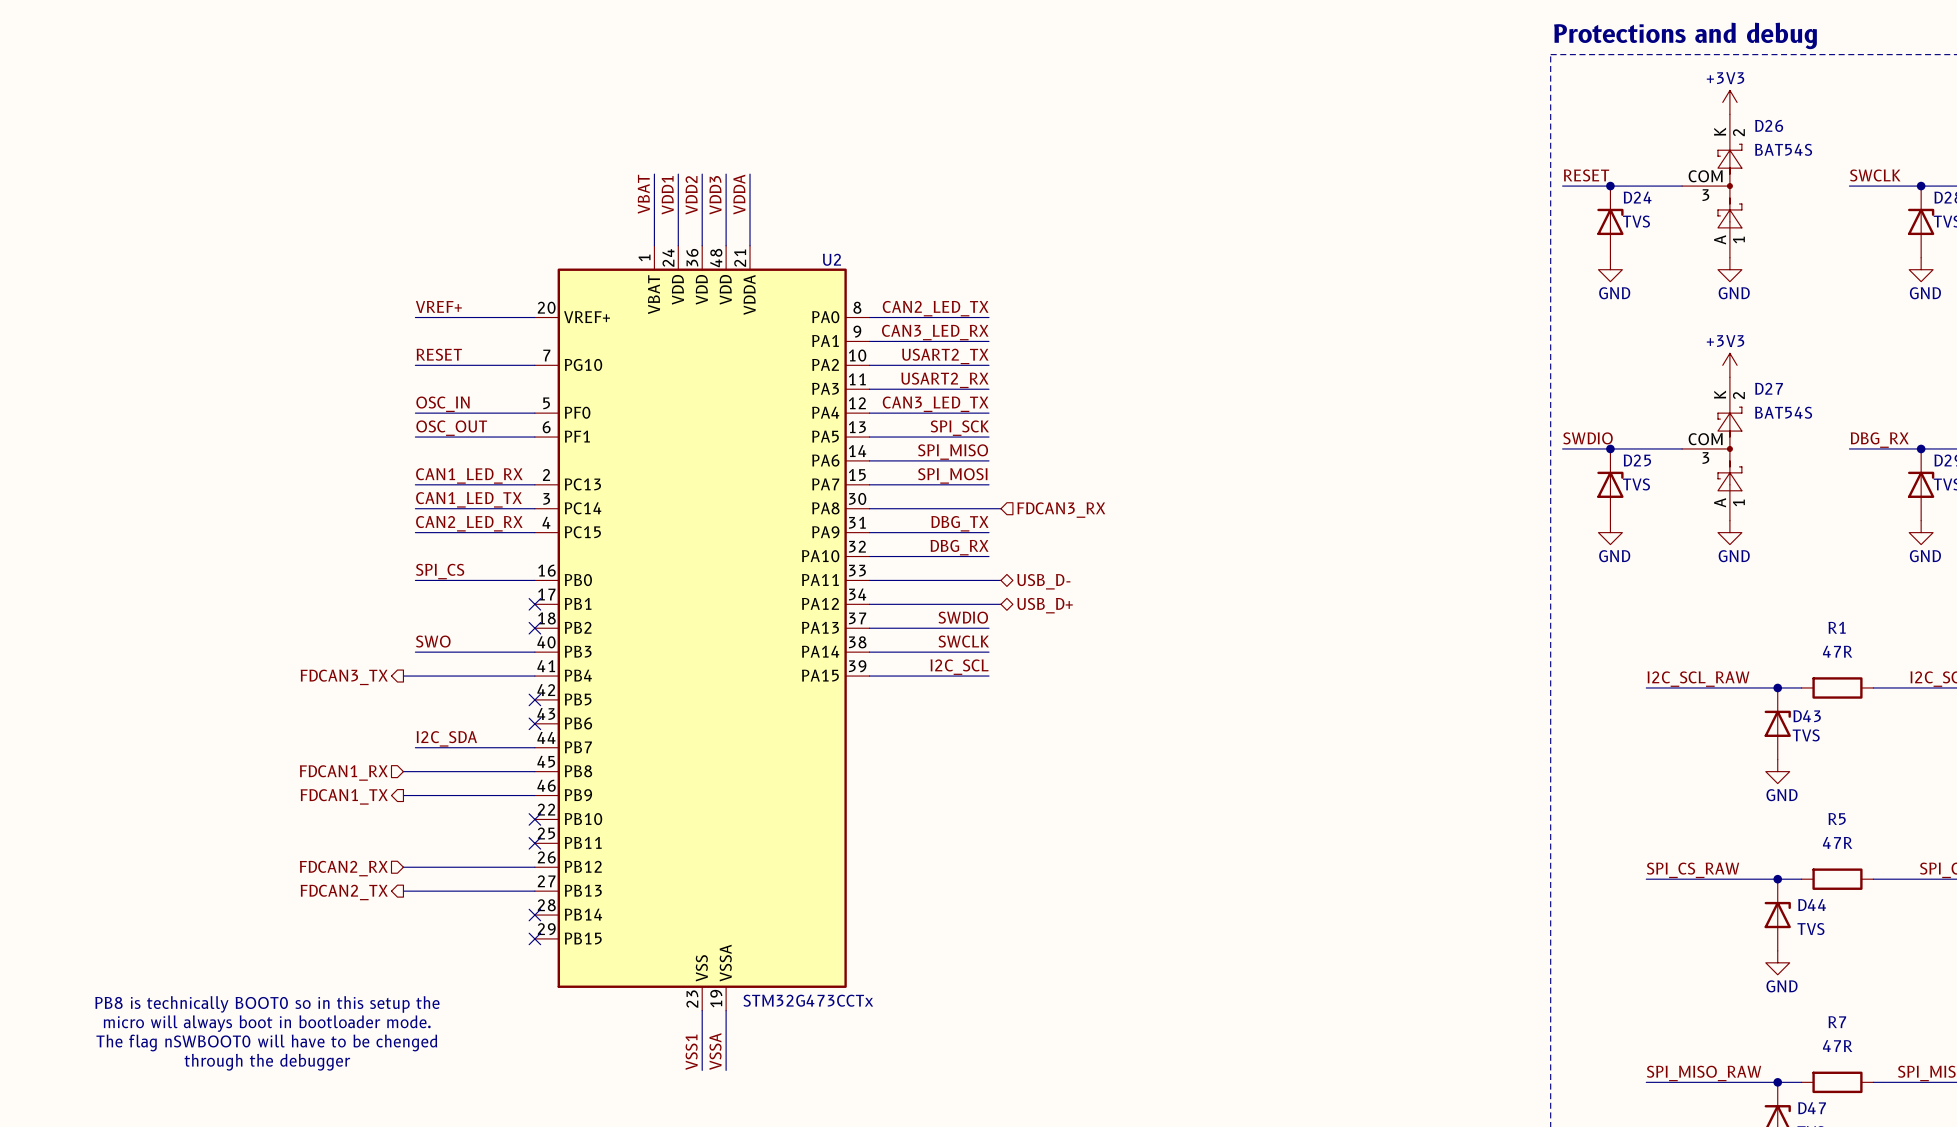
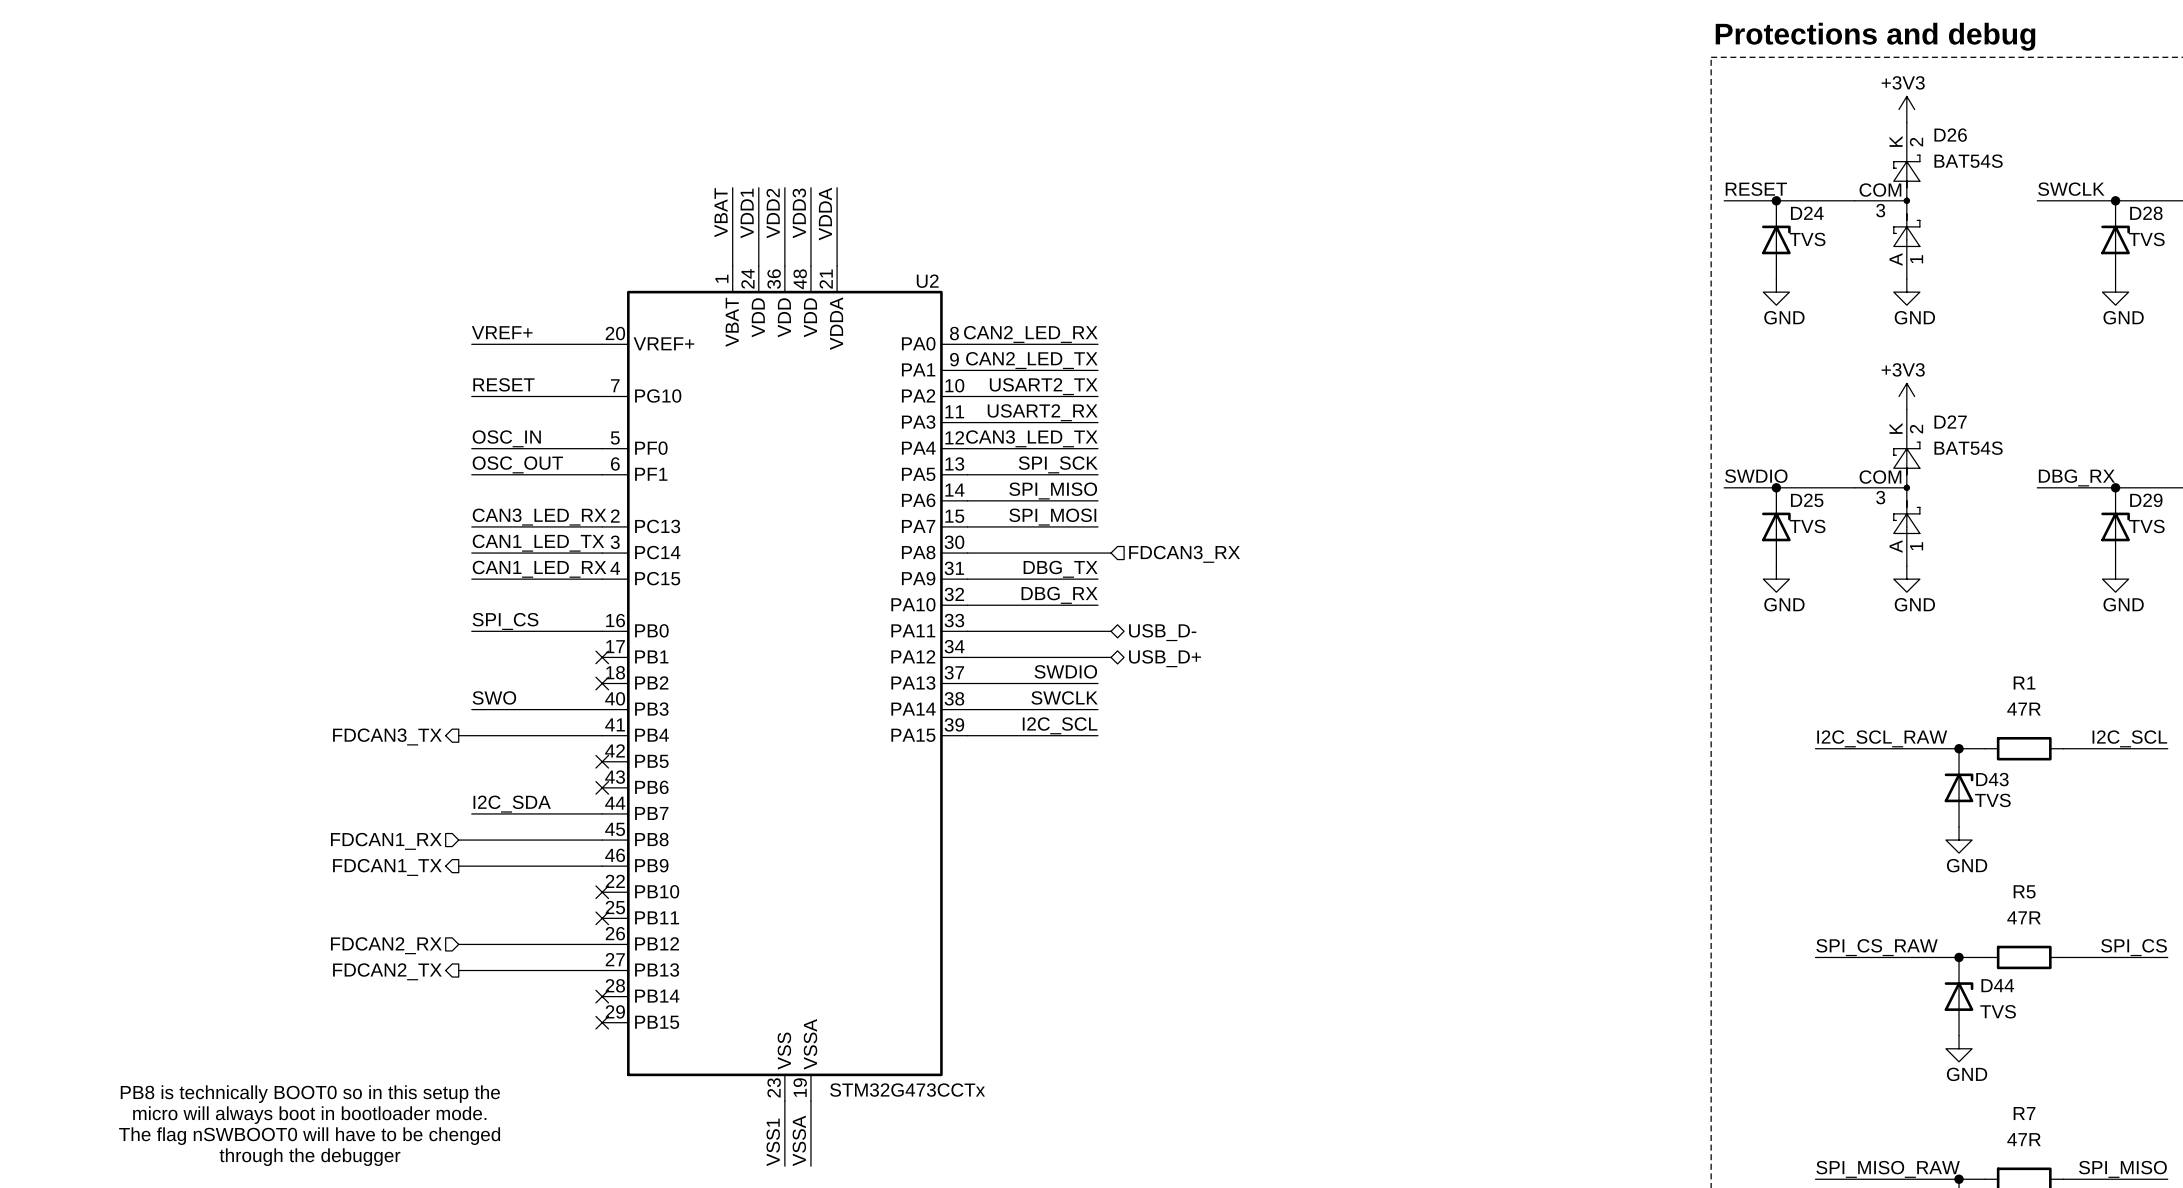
label: CAN2_LED_TX (935, 308) -> CAN2_LED_RX (1030, 334)
label: CAN3_LED_RX (935, 332) -> CAN2_LED_TX (1031, 360)
label: CAN1_LED_RX (469, 475) -> CAN3_LED_RX (539, 517)
label: CAN2_LED_RX (469, 523) -> CAN1_LED_RX (539, 569)

